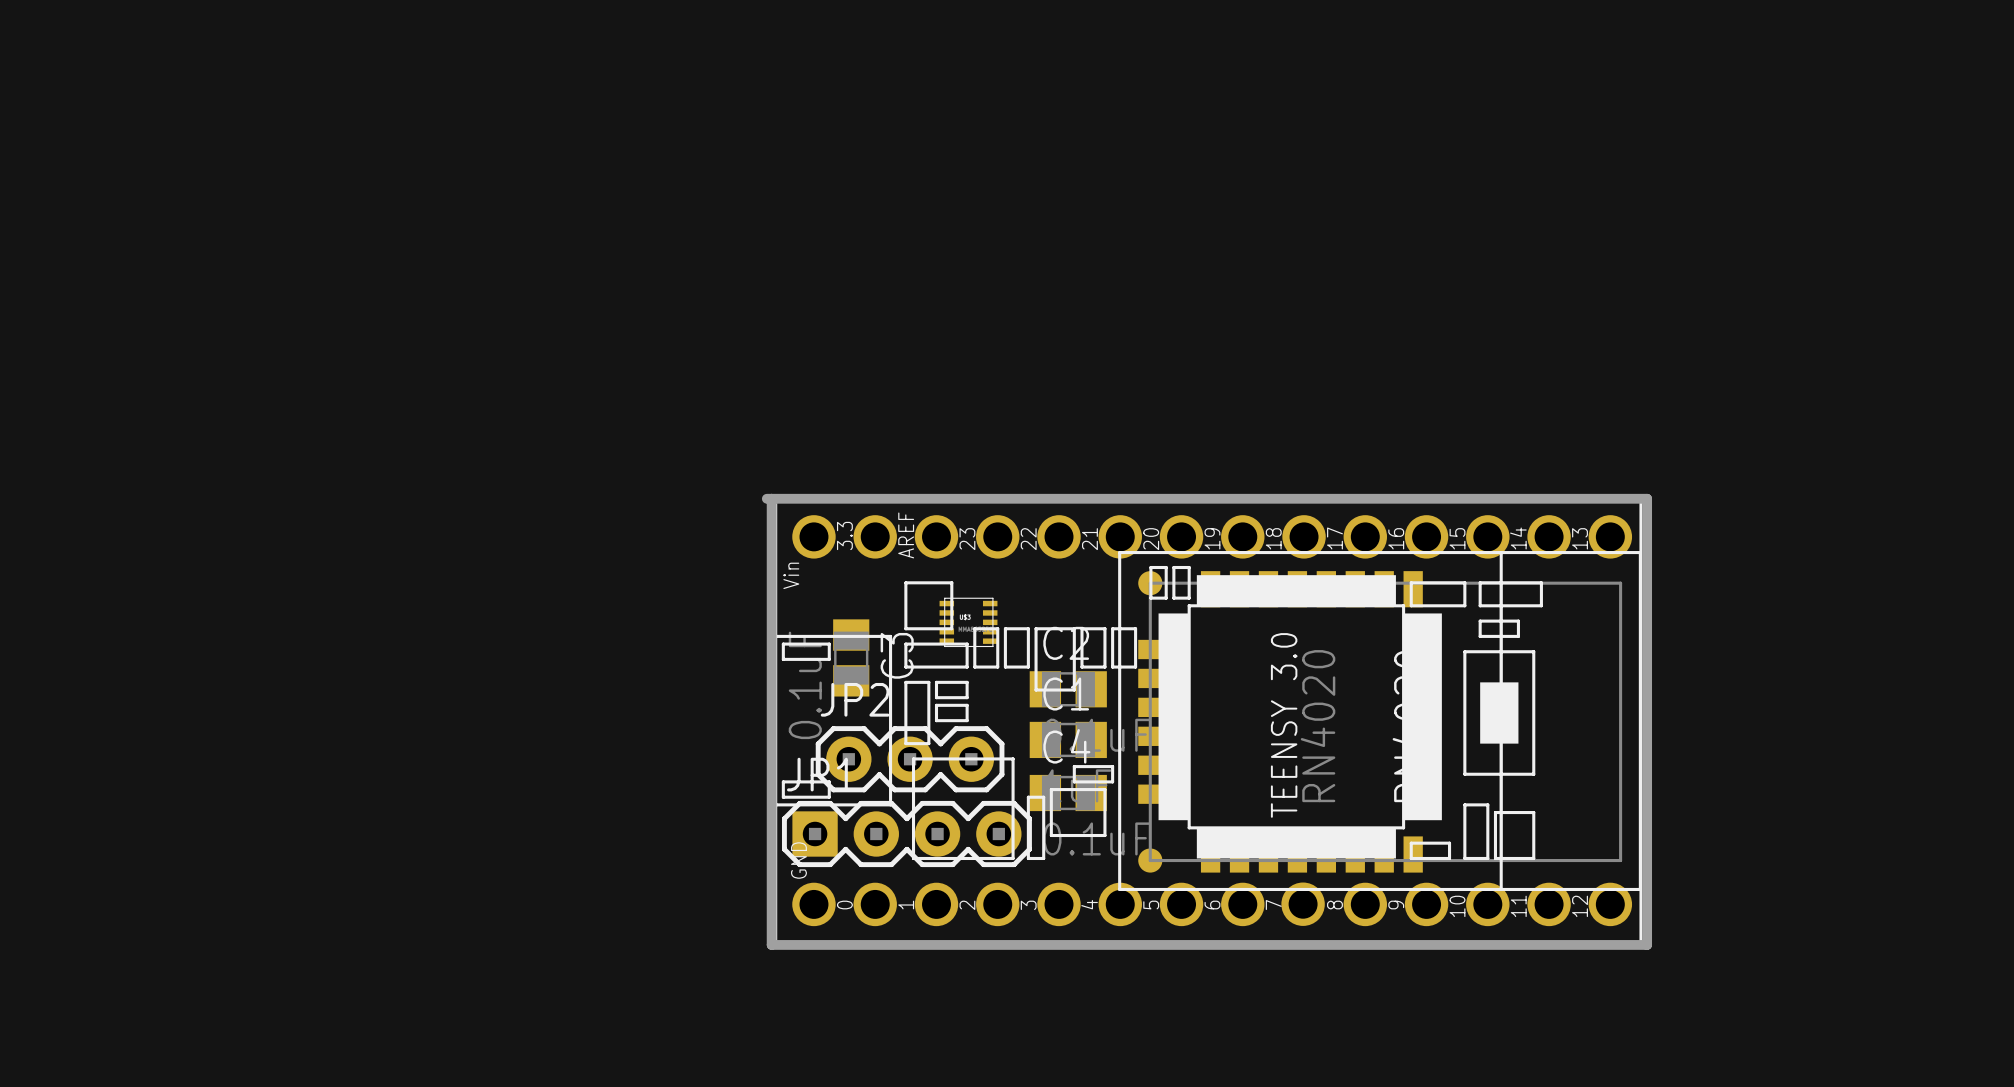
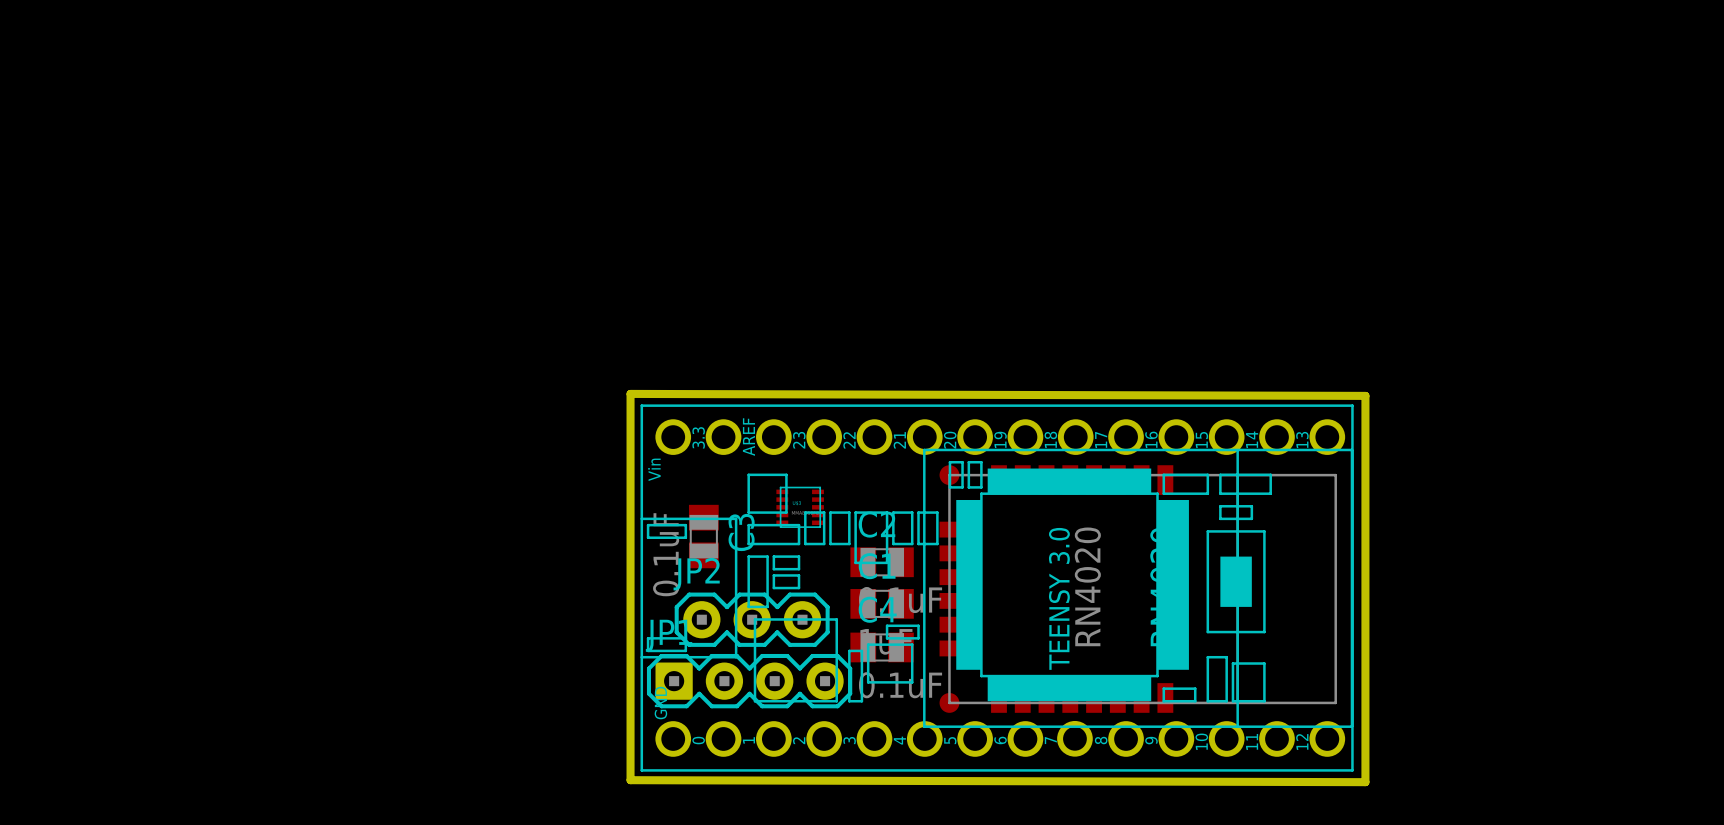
board edge: none -> (630, 393) (630, 780) (1365, 782) (1365, 395) (630, 393)
board edge: (766, 498) (1647, 498) (1647, 944) (771, 944) (771, 498) -> none

